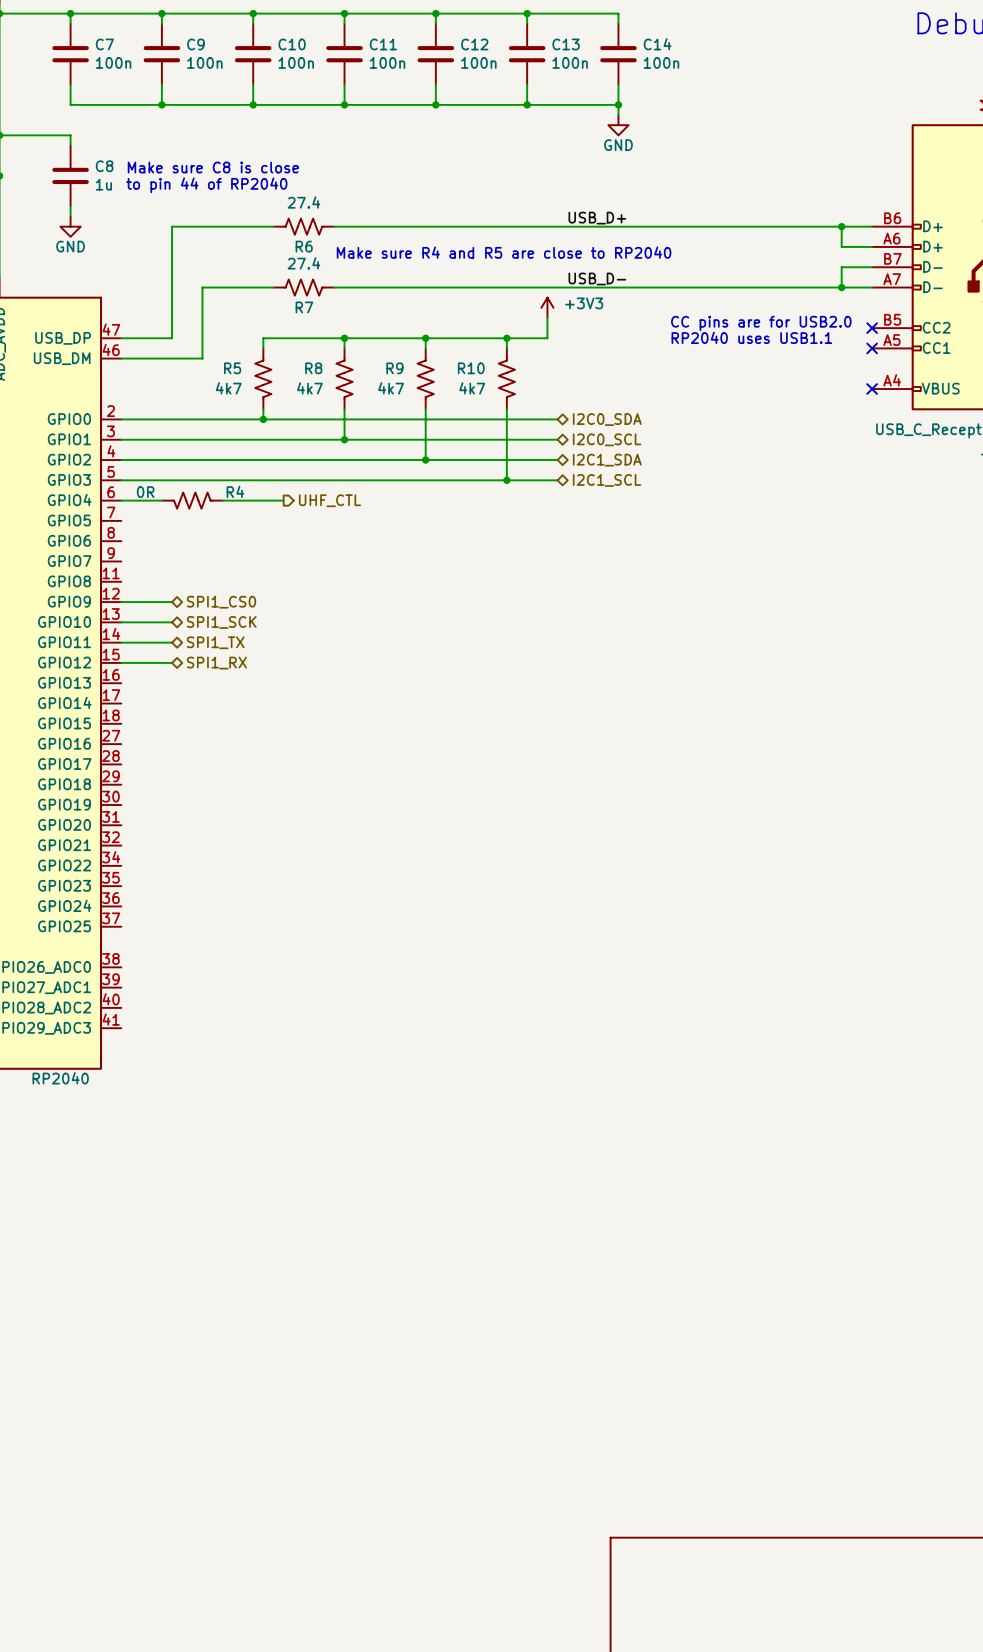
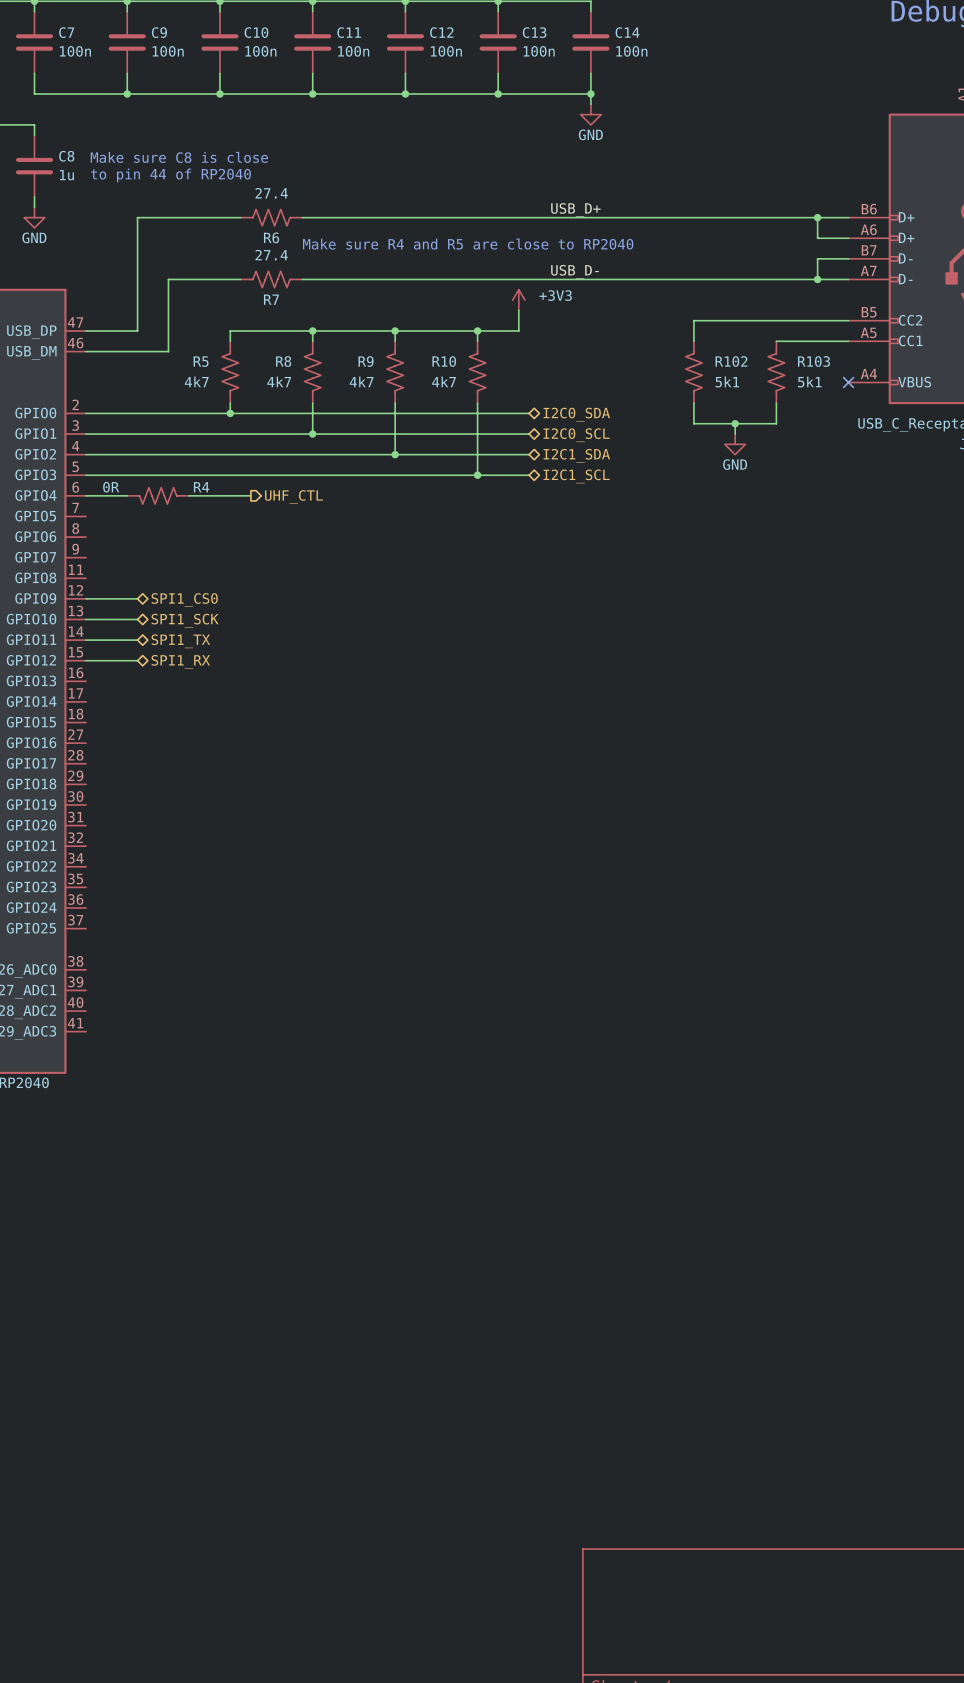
text: CC pins are for USB2.0 (761, 323) -> none
wire: none -> (848, 320) (693, 320) (693, 341)
no-connect mark: (872, 328) -> none
text: RP2040 uses USB1.1 (751, 337) -> none
wire: none -> (776, 341) (848, 341)
no-connect mark: (872, 348) -> none
R102: none -> 5k1 (693, 372)
R103: none -> 5k1 (776, 372)
wire: none -> (693, 403) (693, 423) (776, 423) (776, 403)
wire: none -> (735, 423) (735, 434)
junction: none -> (735, 423)
power symbol: none -> GND (735, 444)

